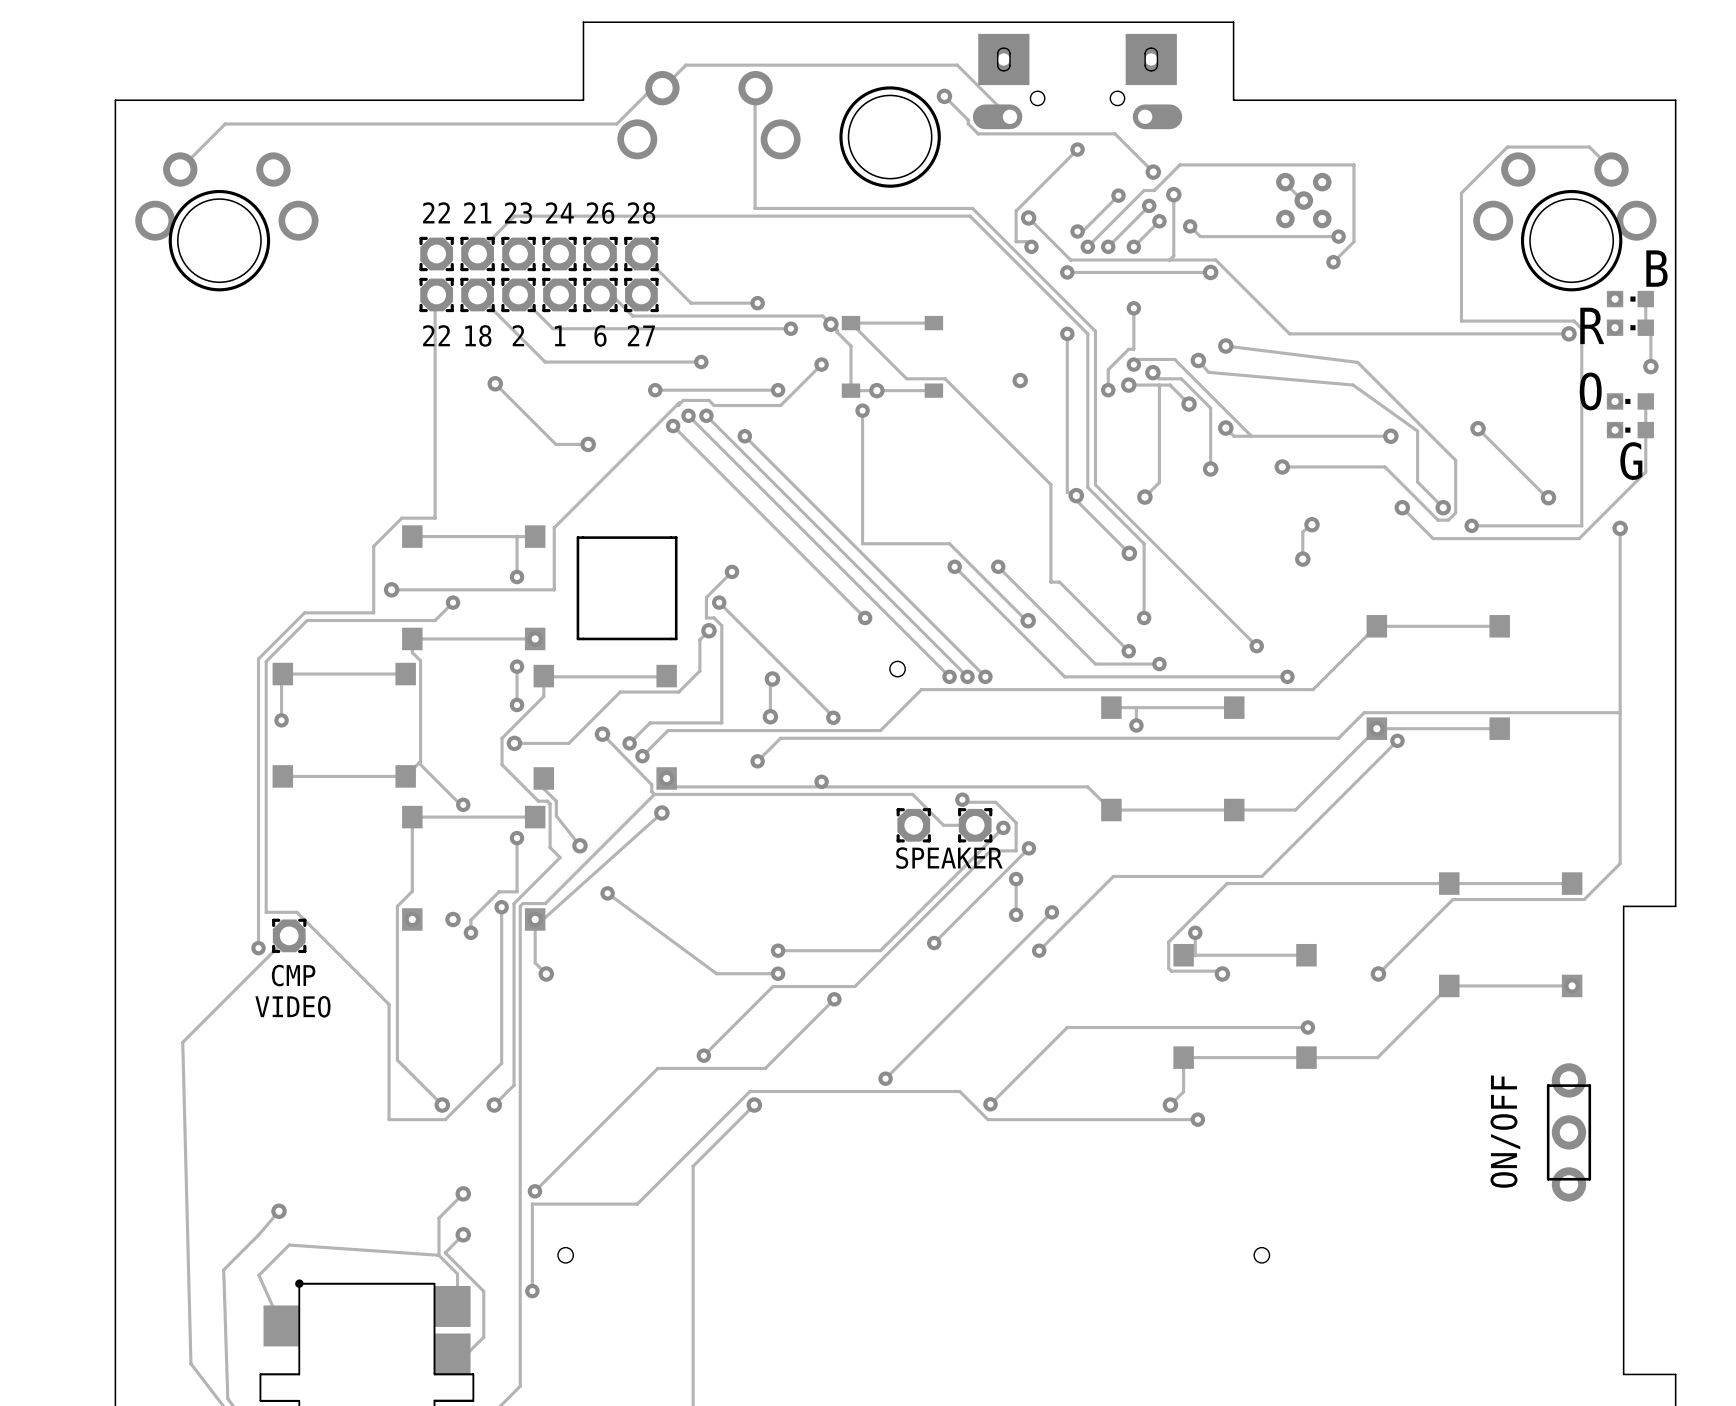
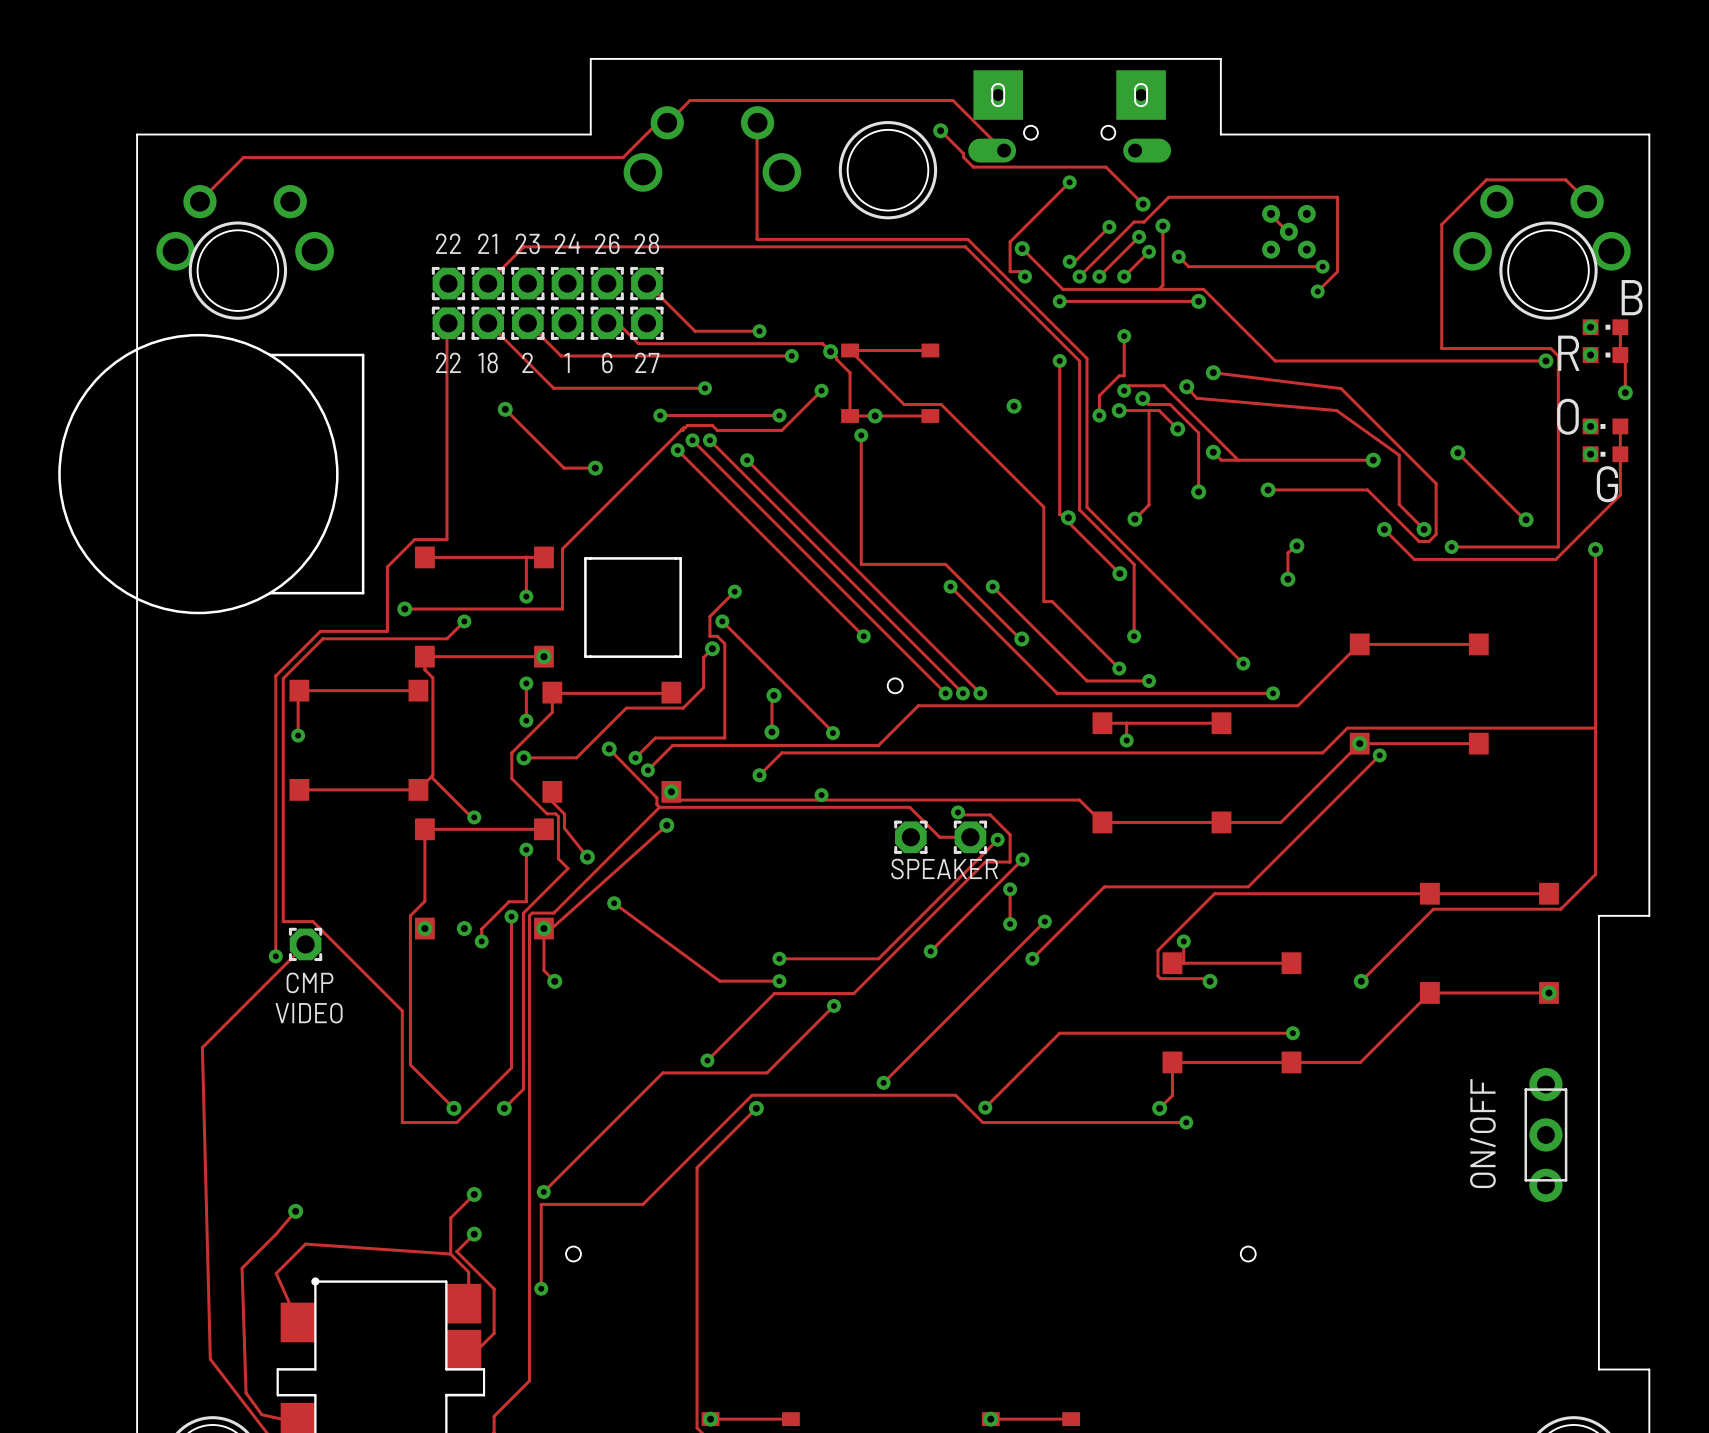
part: none -> (211, 474)

